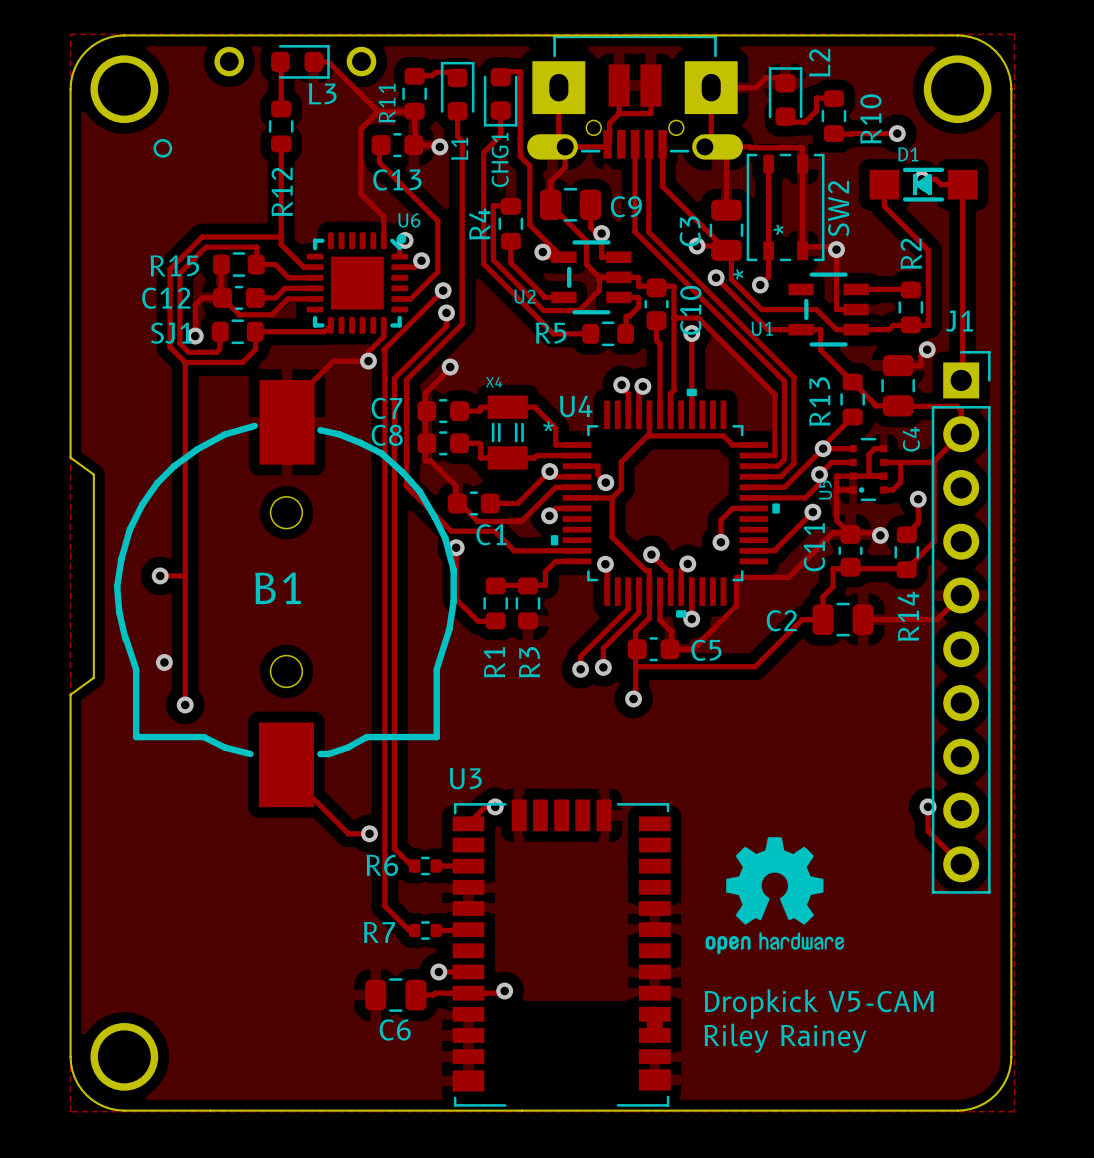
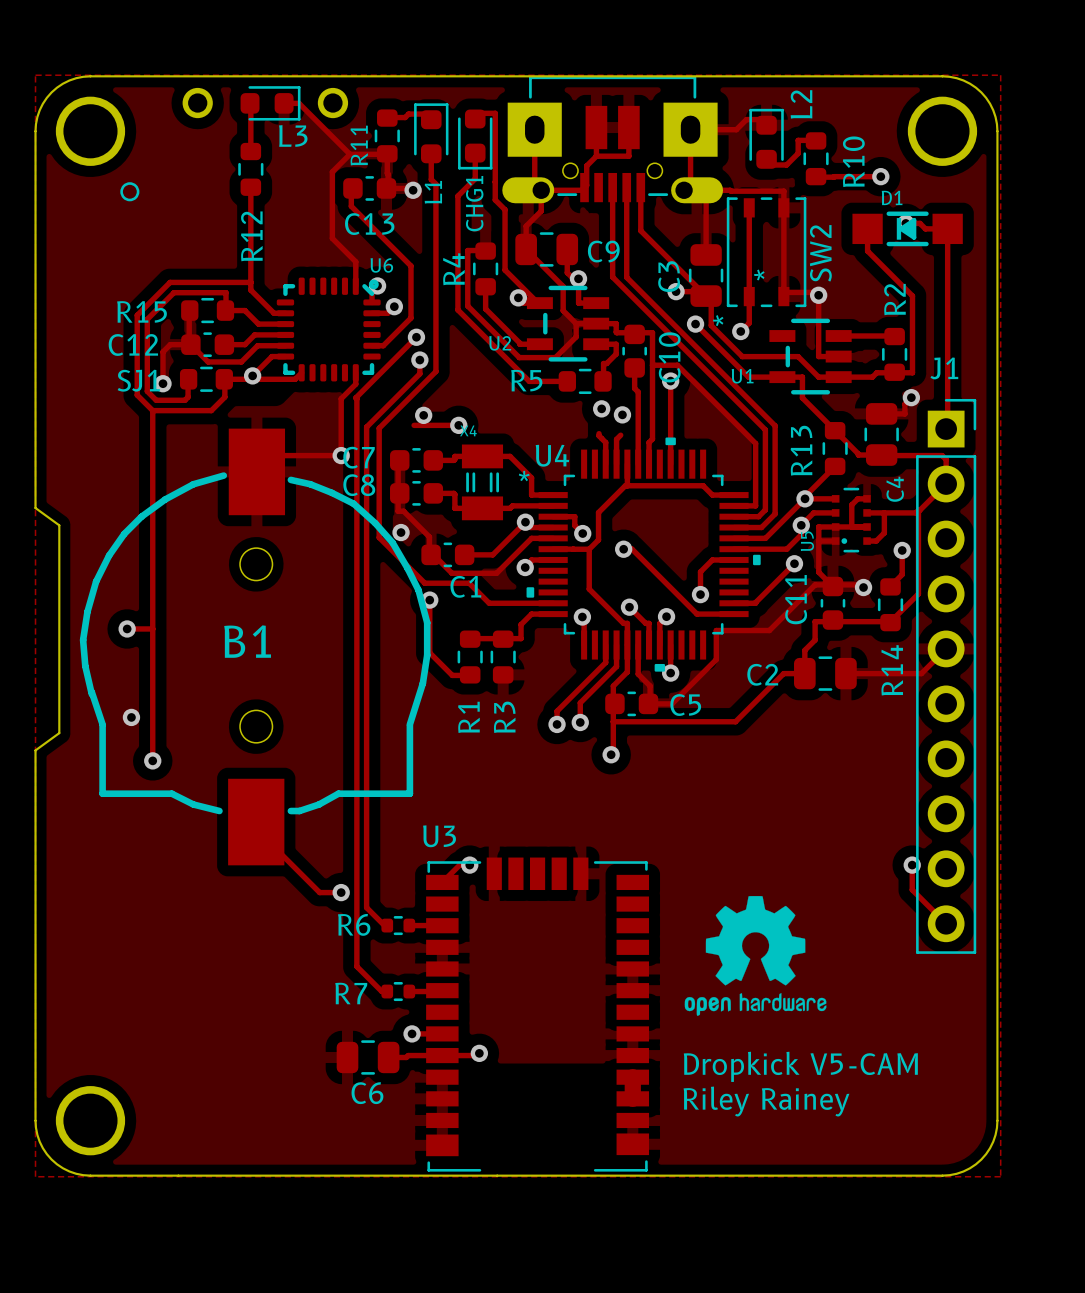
U6 footprint: [306, 232, 409, 334] -> [276, 277, 381, 382]
track: none -> (285, 356) (271, 356) (252, 375)
via: none -> (252, 375)
track: (369, 350) (368, 361) (333, 361) (288, 406) -> (341, 398) (341, 455) (258, 455)
via: none -> (601, 408)
via position: (368, 361) -> (341, 455)
via: none -> (622, 414)
track: (450, 367) (425, 393) (425, 411) -> none
track: none -> (414, 425) (458, 425)
via: none -> (458, 425)
via: (621, 384) -> none
via: (642, 386) -> none
via: none -> (401, 532)
track: none -> (623, 549) (631, 549) (696, 614) (734, 614)
via: none -> (623, 549)

